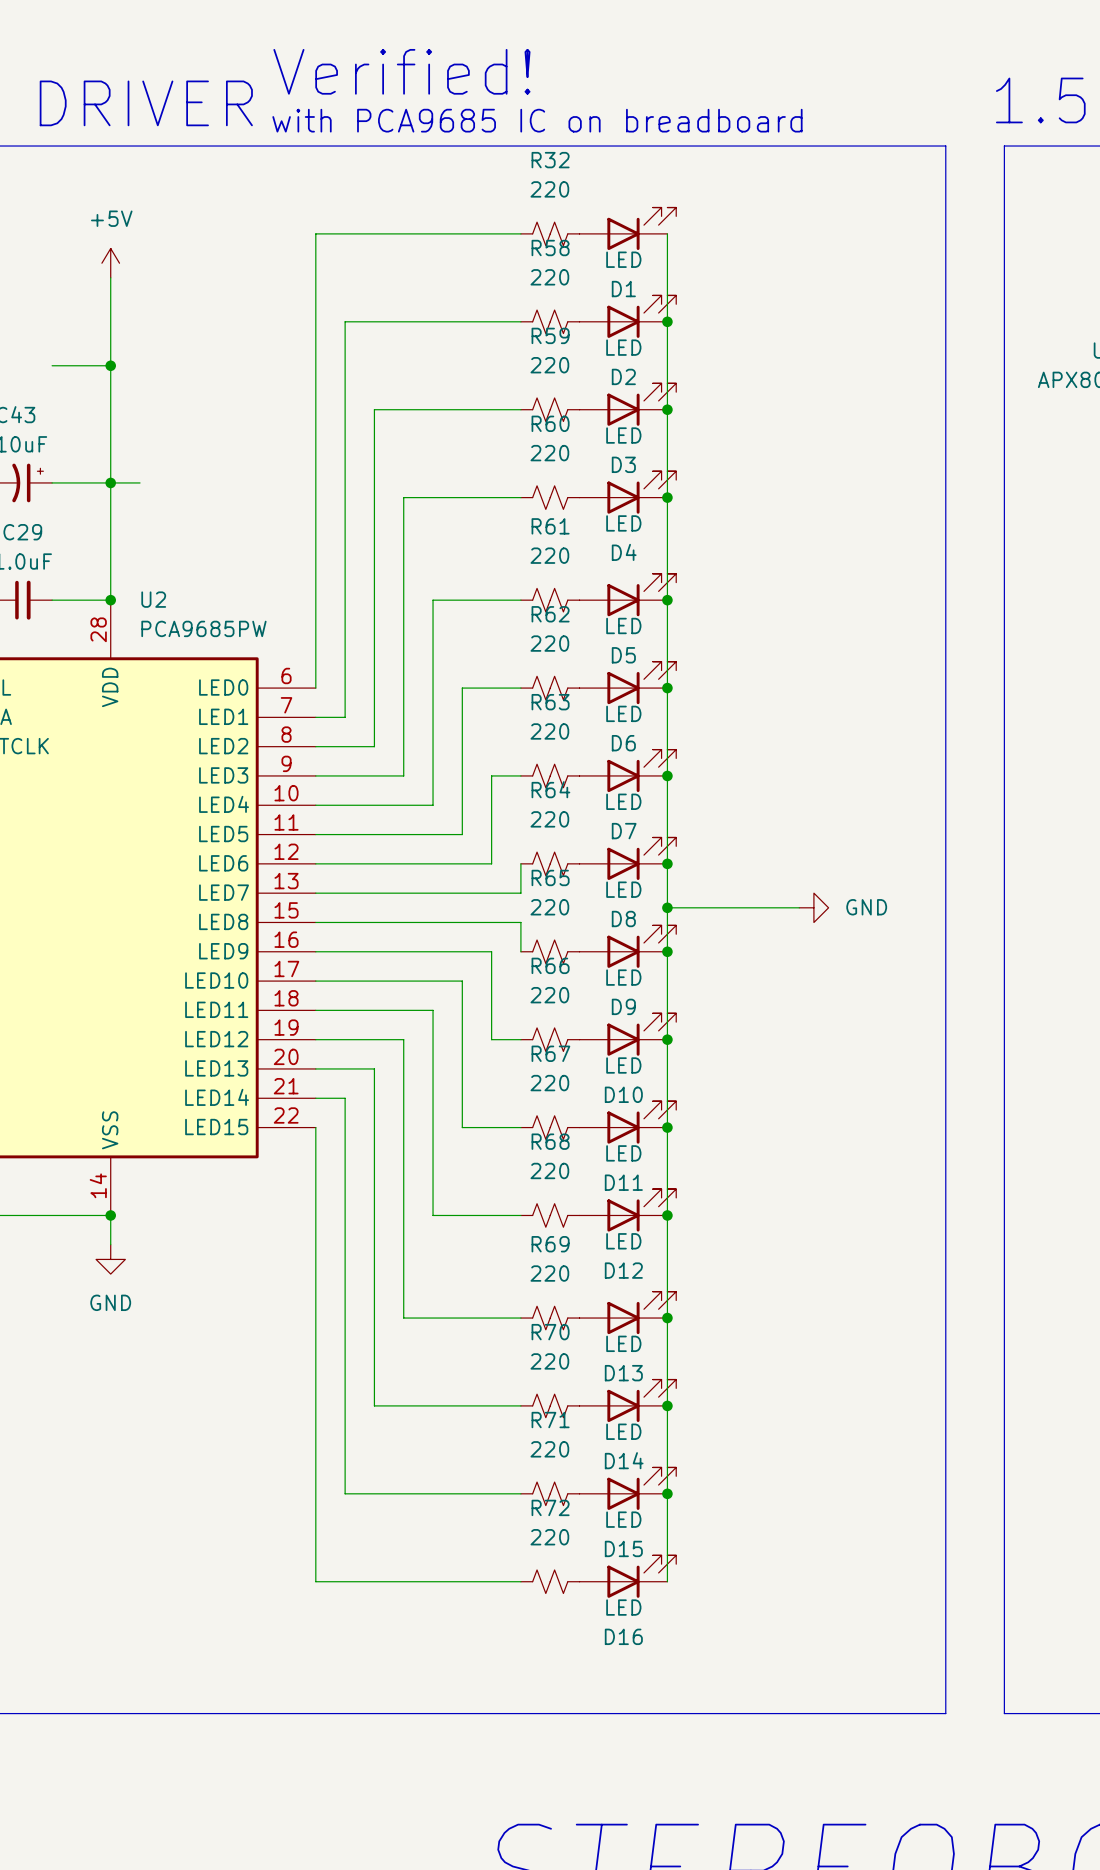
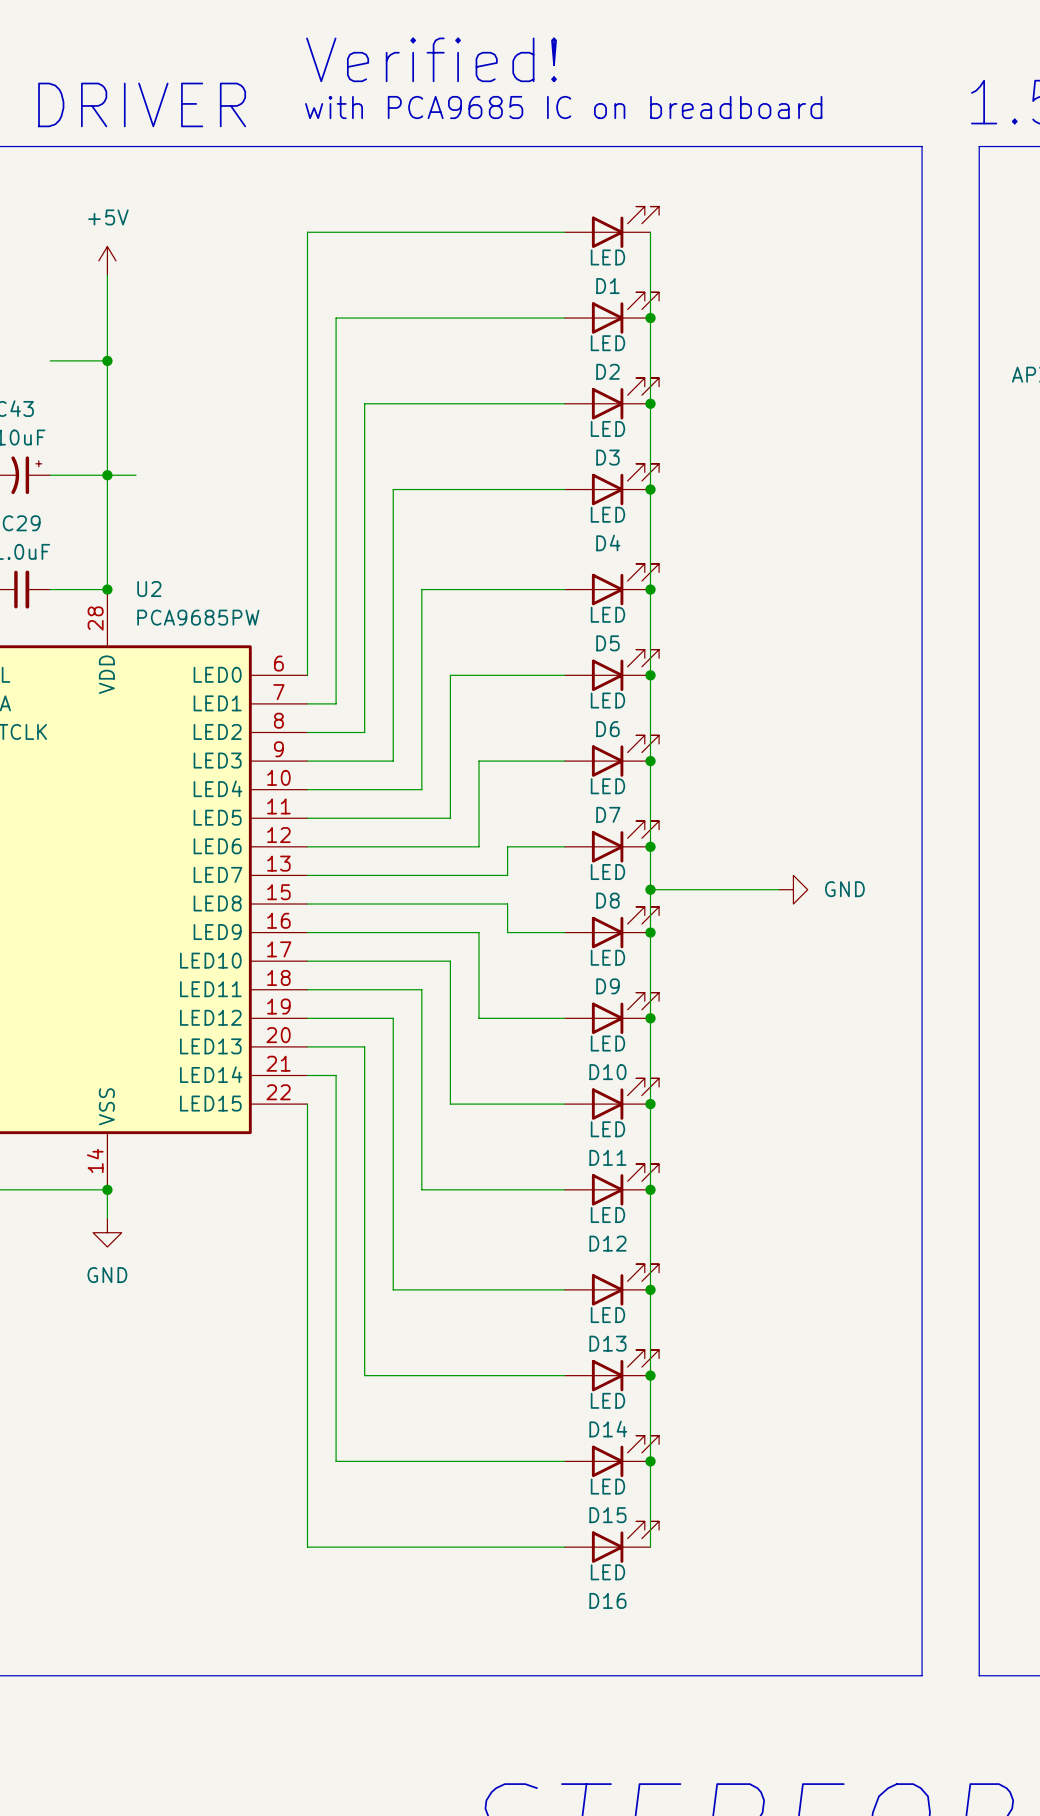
text position: Verified! (401, 71) -> Verified! (431, 59)
text position: with PCA9685 IC on breadboard (537, 120) -> with PCA9685 IC on breadboard (563, 107)
wire: none -> (507, 232) (564, 232)
R32: 220 (550, 233) -> none
wire: none -> (507, 318) (564, 318)
R58: 220 (550, 321) -> none
wire: none -> (507, 403) (564, 403)
R59: 220 (550, 409) -> none
wire: none -> (507, 489) (564, 489)
R60: 220 (550, 497) -> none
wire: none -> (507, 589) (564, 589)
R61: 220 (550, 600) -> none
wire: none -> (507, 675) (564, 675)
R62: 220 (550, 688) -> none
wire: none -> (507, 761) (564, 761)
R63: 220 (550, 775) -> none
wire: none -> (507, 846) (564, 846)
R64: 220 (550, 863) -> none
wire: none -> (507, 932) (564, 932)
R65: 220 (550, 951) -> none
wire: none -> (507, 1018) (564, 1018)
R66: 220 (550, 1039) -> none
wire: none -> (507, 1104) (564, 1104)
R67: 220 (550, 1127) -> none
wire: none -> (507, 1189) (564, 1189)
R68: 220 (550, 1215) -> none
wire: none -> (507, 1289) (564, 1289)
R69: 220 (550, 1318) -> none
wire: none -> (507, 1375) (564, 1375)
R70: 220 (550, 1405) -> none
wire: none -> (507, 1461) (564, 1461)
R71: 220 (550, 1493) -> none
wire: none -> (507, 1547) (564, 1547)
R72: 220 (550, 1581) -> none

